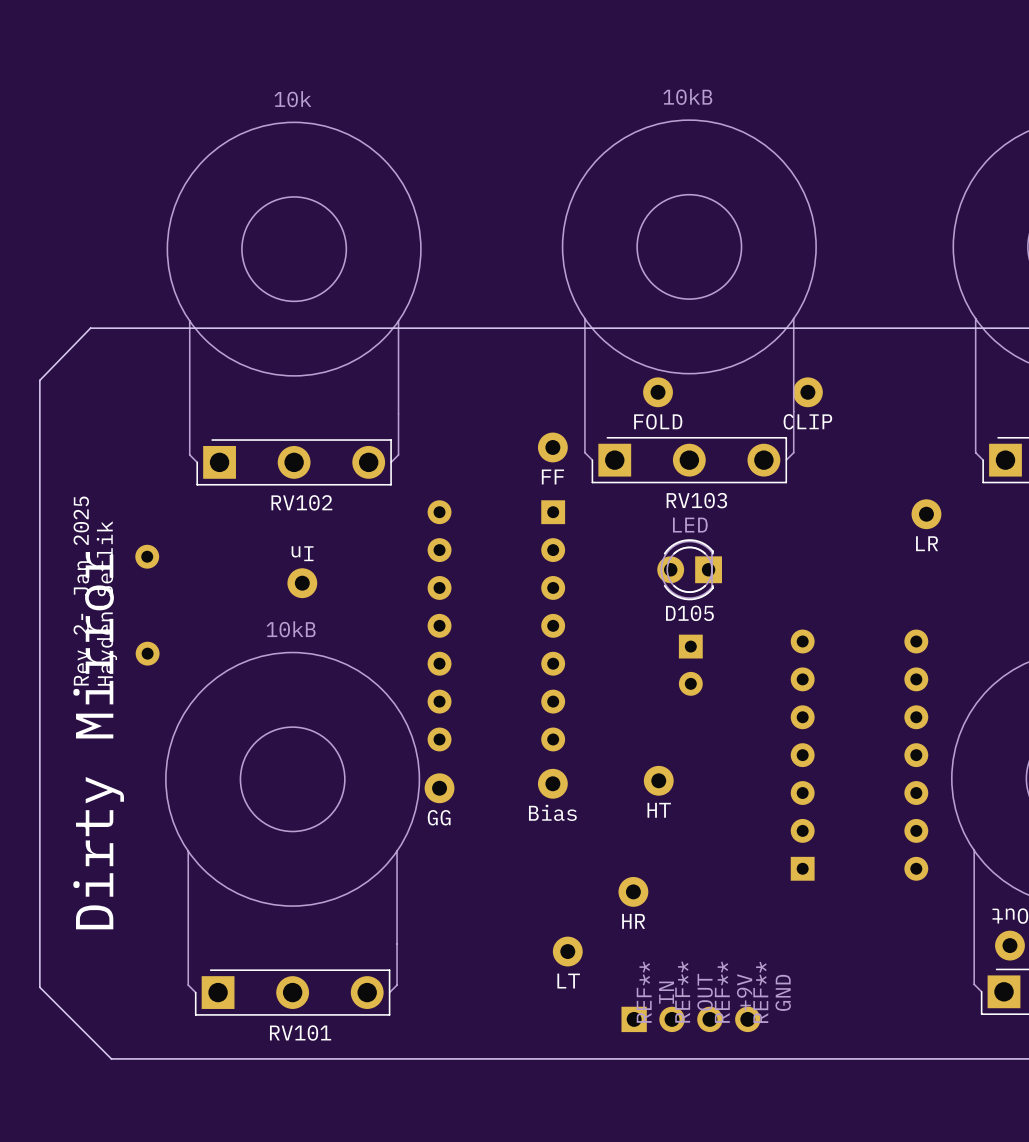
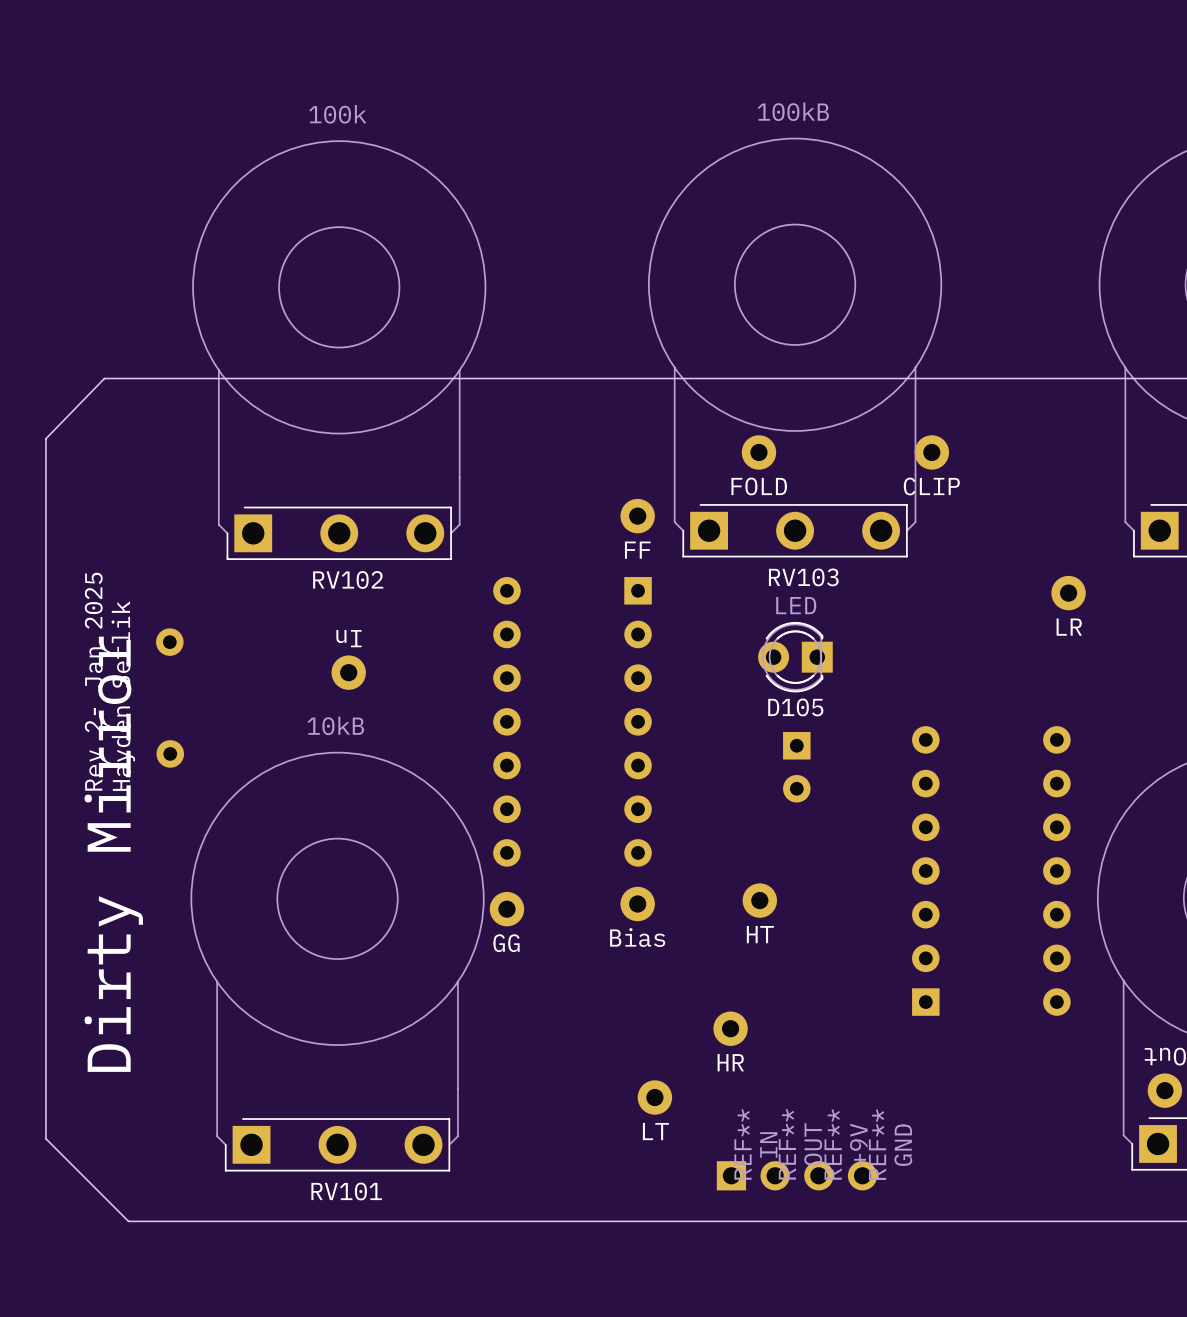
RV103 value: 10kB (687, 96) -> 100kB (793, 111)
RV102 value: 10k (292, 99) -> 100k (337, 114)

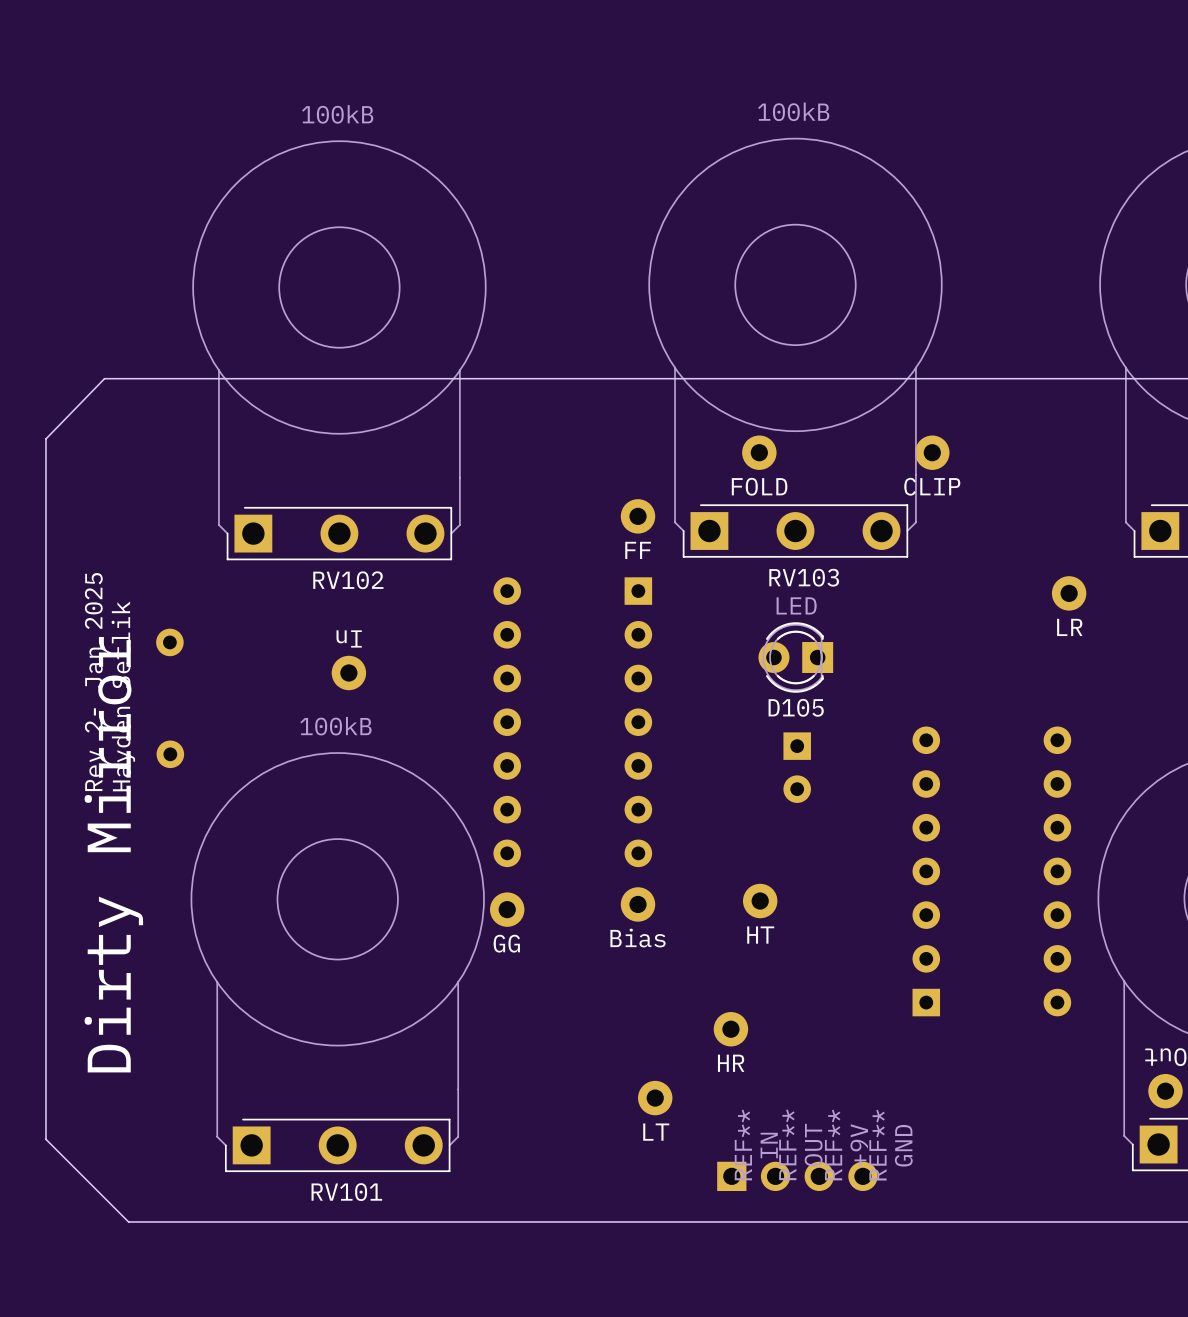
RV102 value: 100k (337, 114) -> 100kB (337, 114)
RV101 value: 10kB (335, 725) -> 100kB (335, 726)

